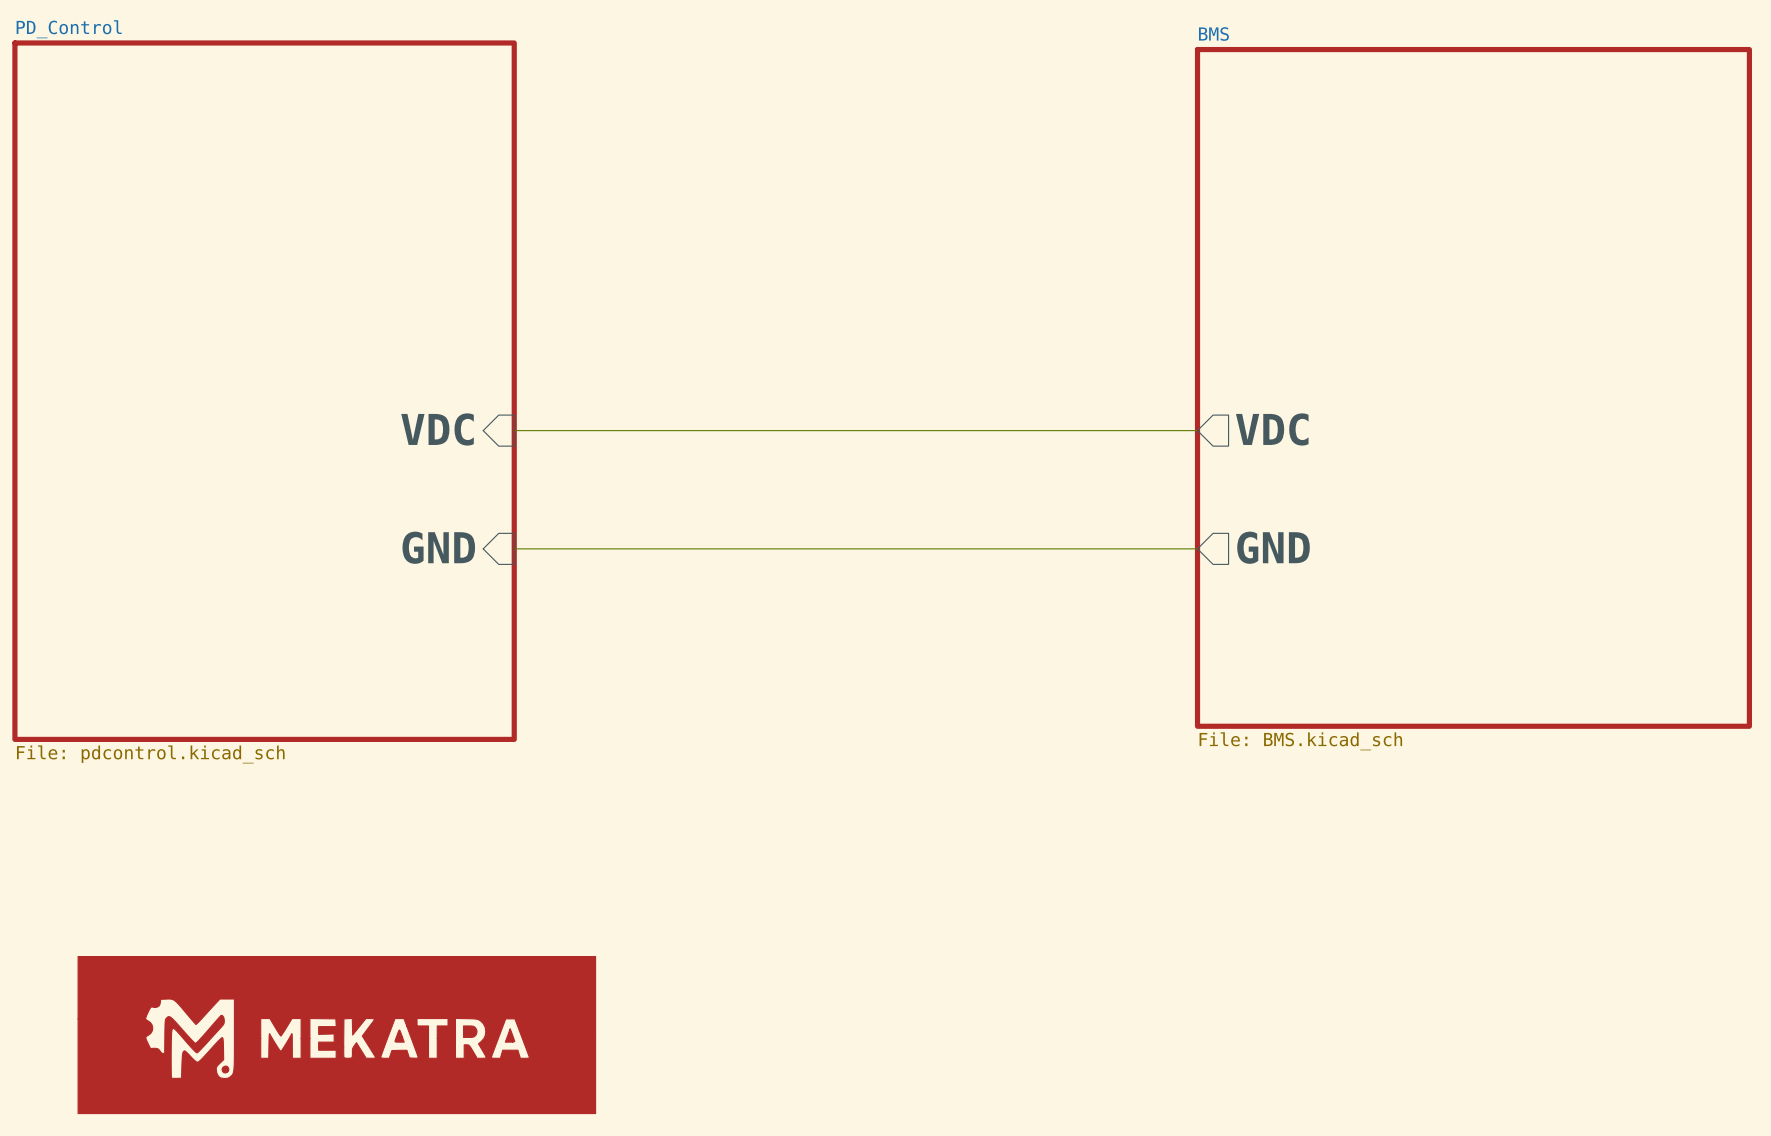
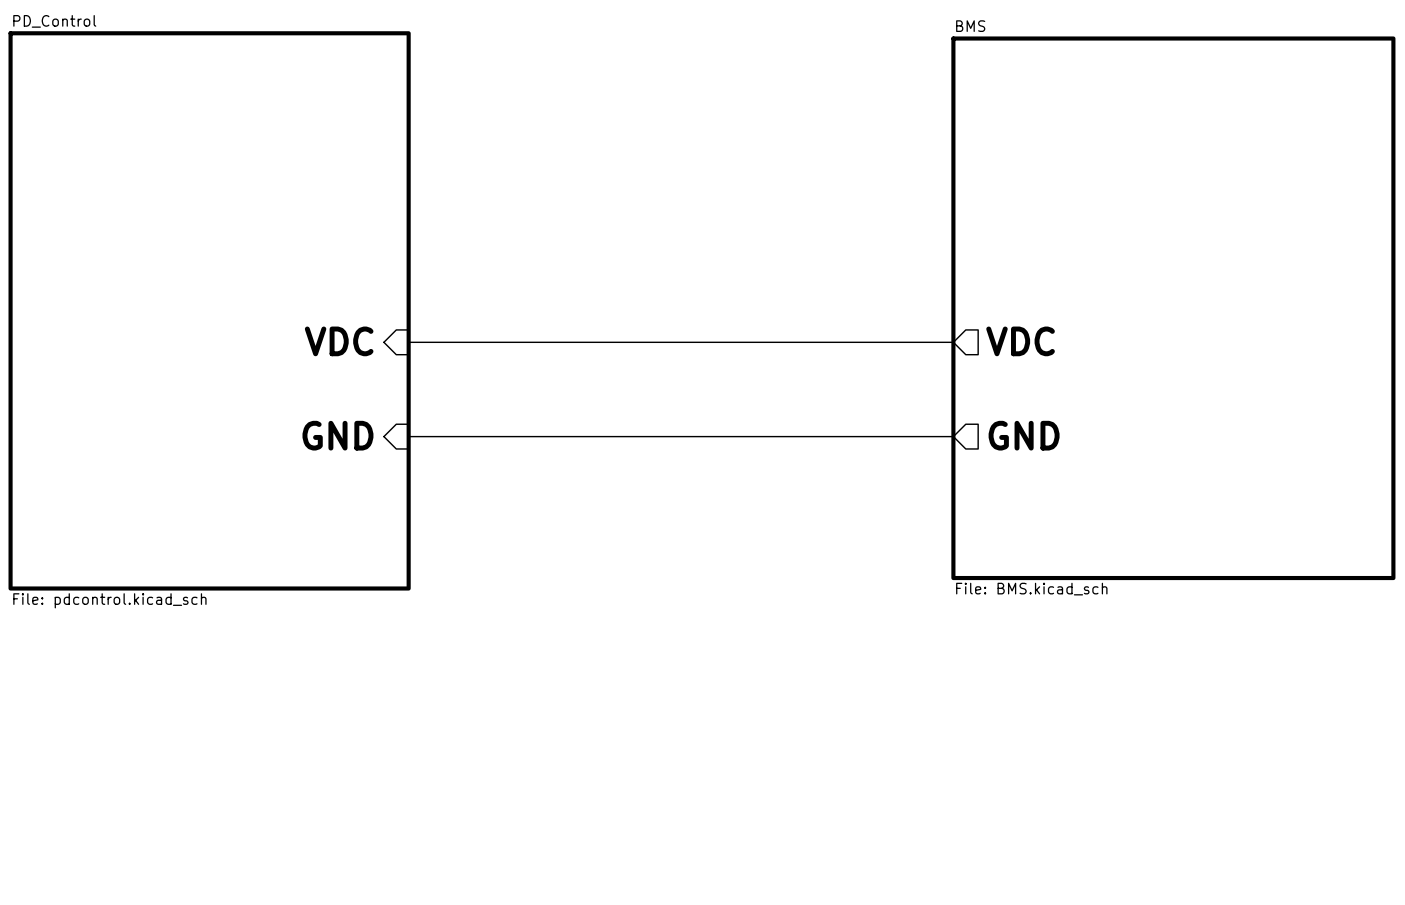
power symbol: (336, 1035) -> none

